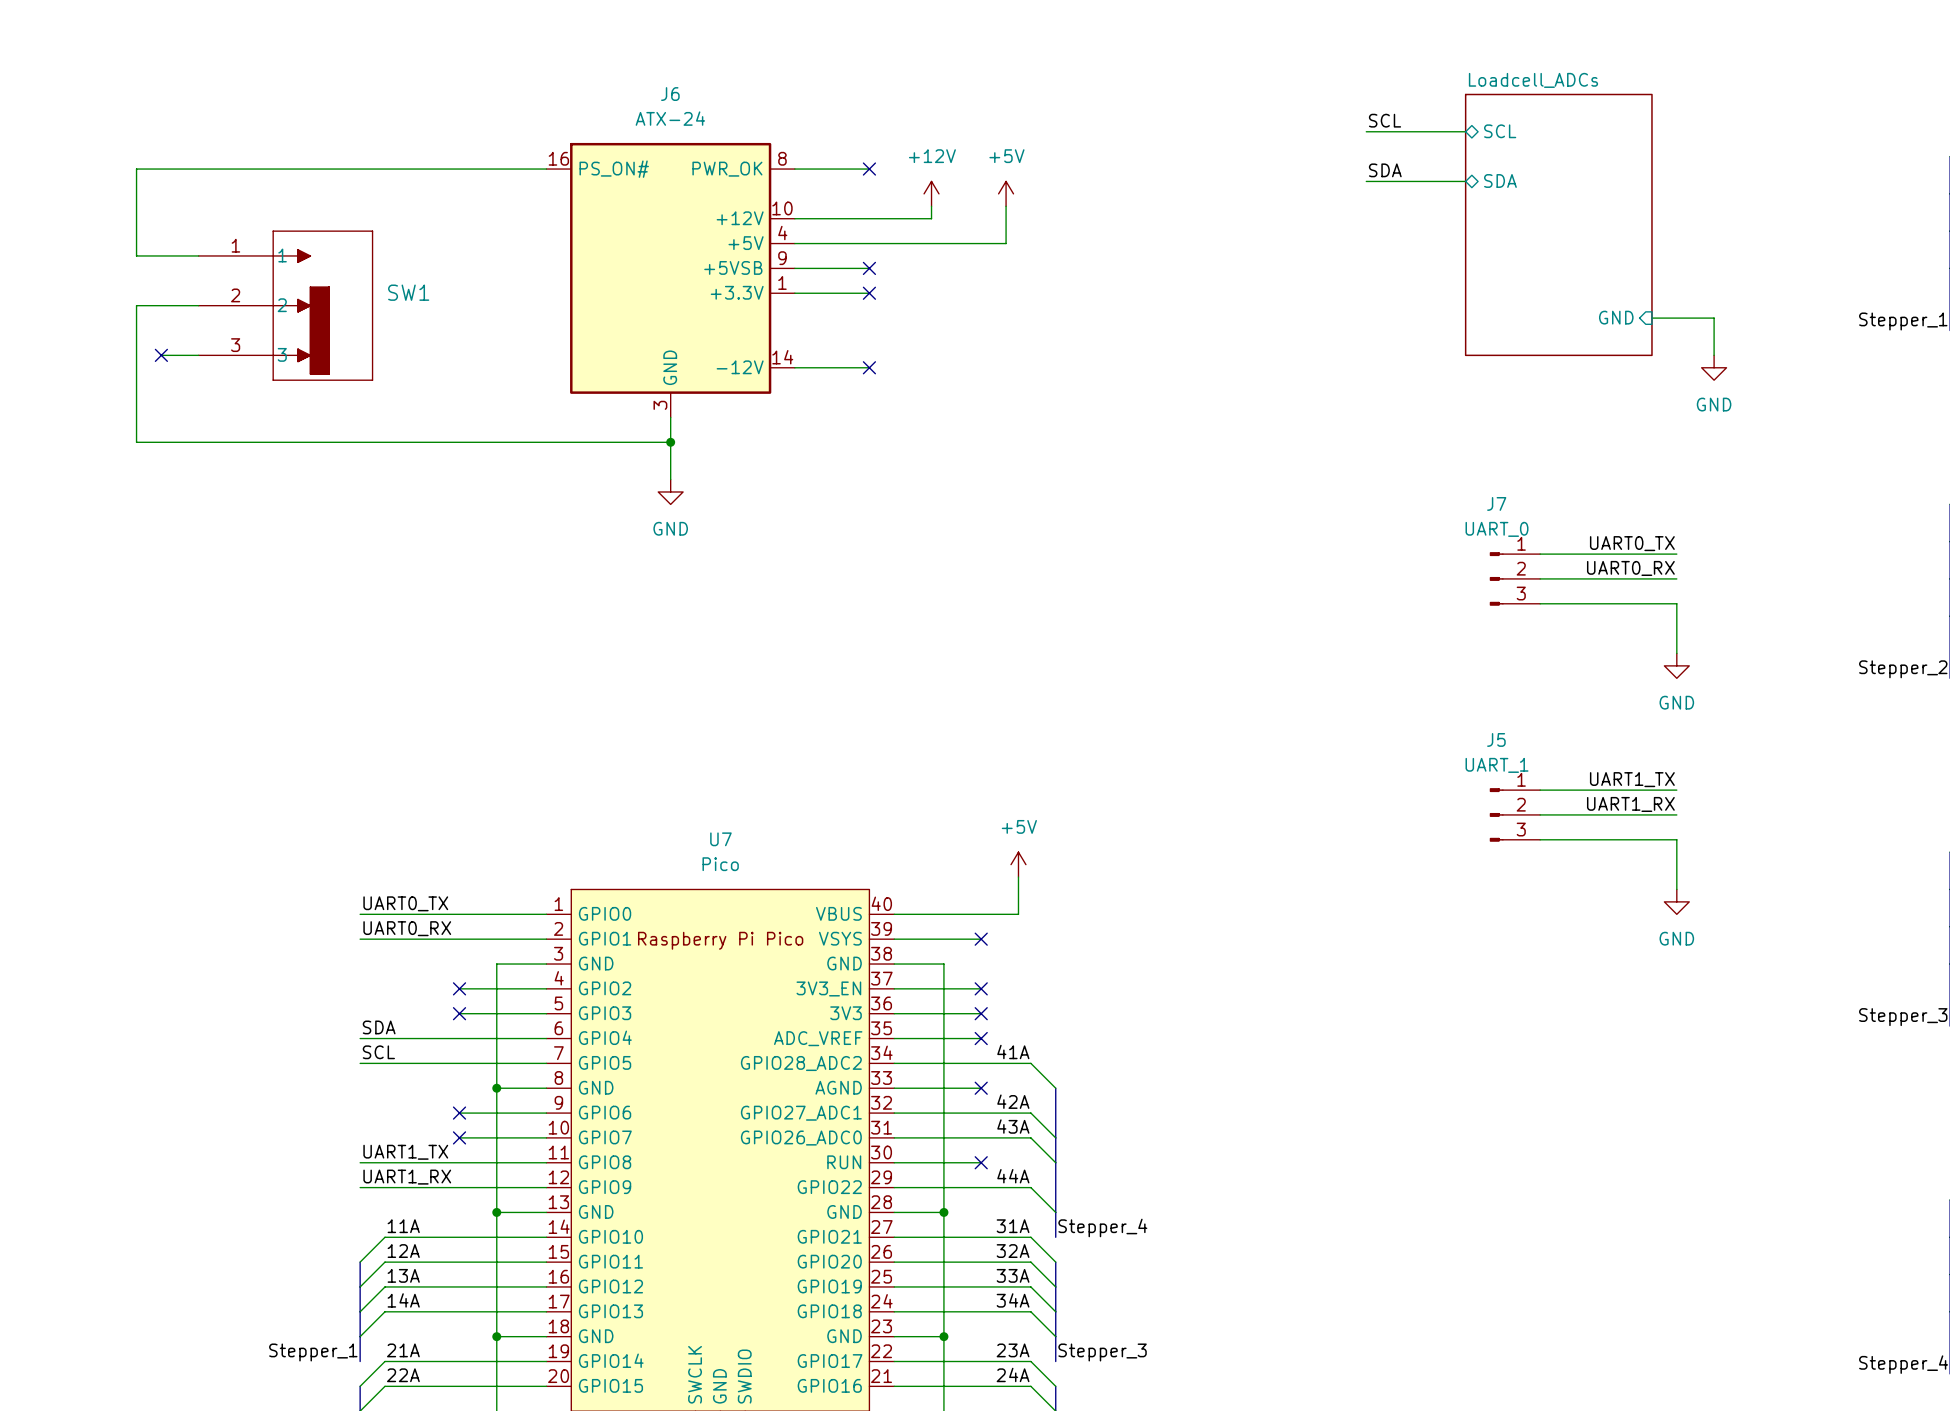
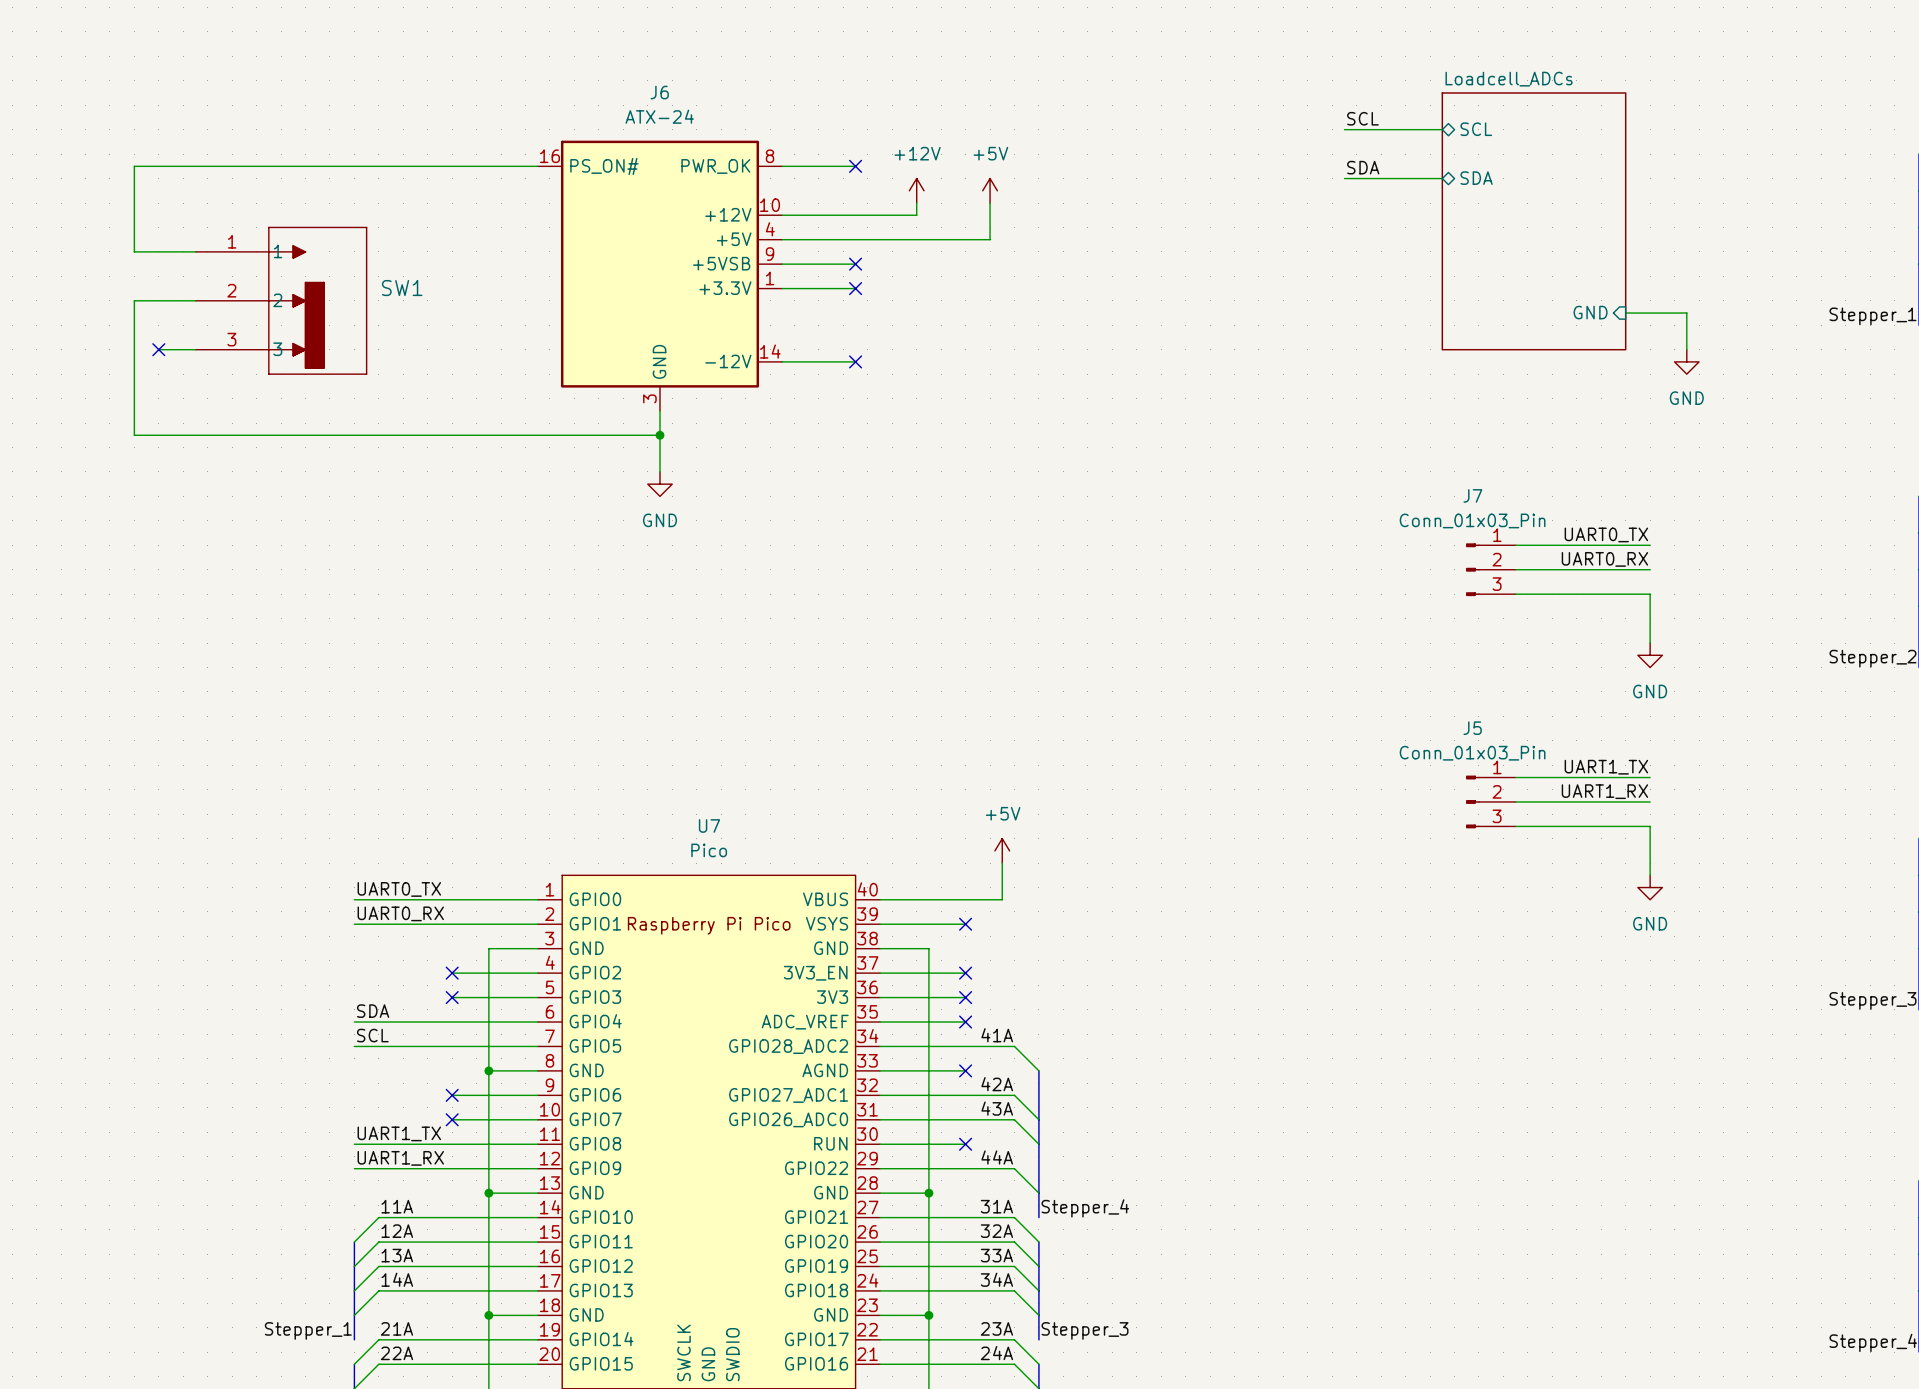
J7 value: UART_0 (1497, 529) -> Conn_01x03_Pin (1472, 520)
J5 value: UART_1 (1497, 765) -> Conn_01x03_Pin (1472, 753)

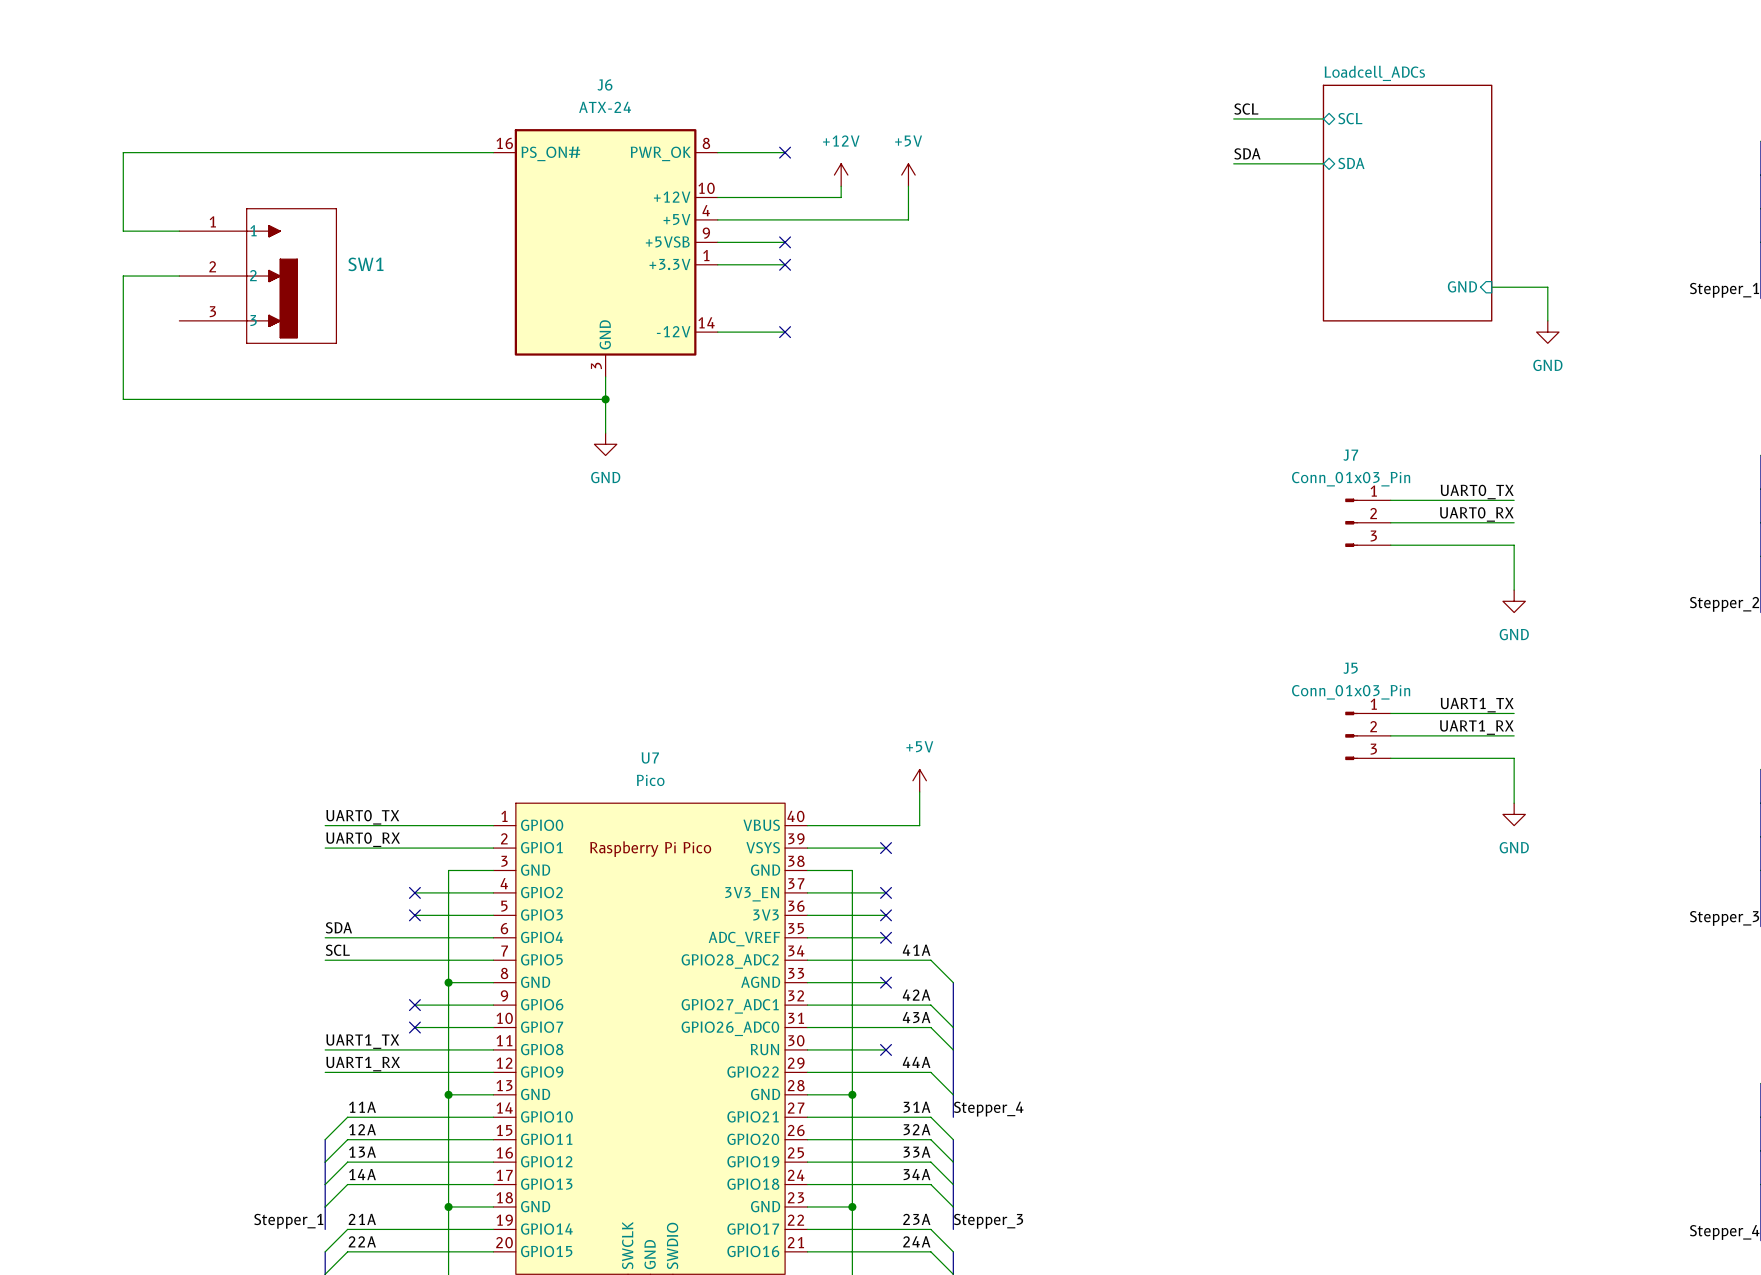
wire: (158, 349) (195, 349) -> none
no-connect mark: (158, 349) -> none

